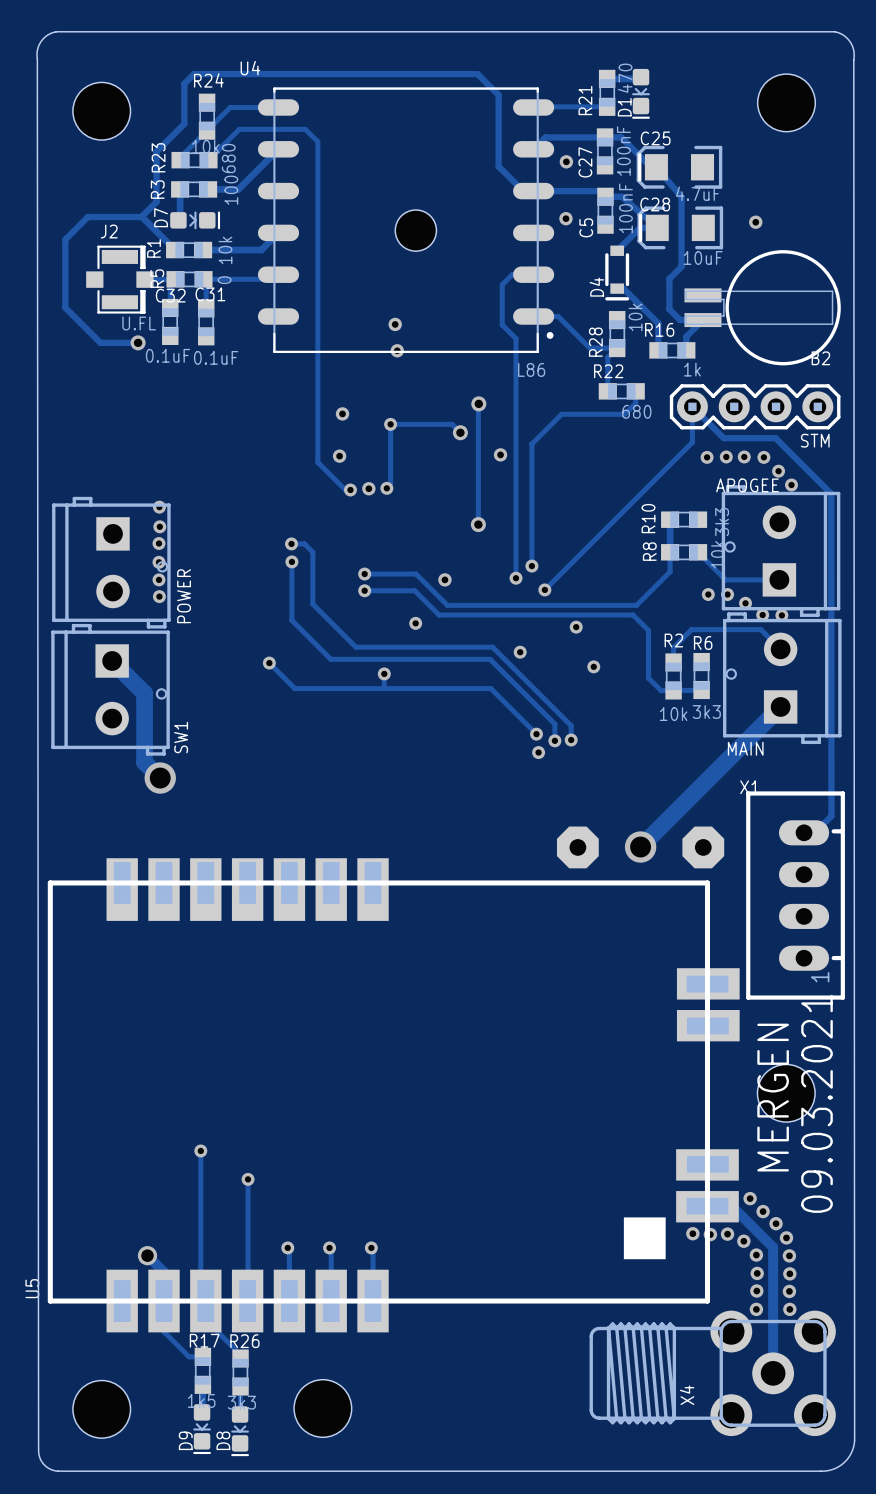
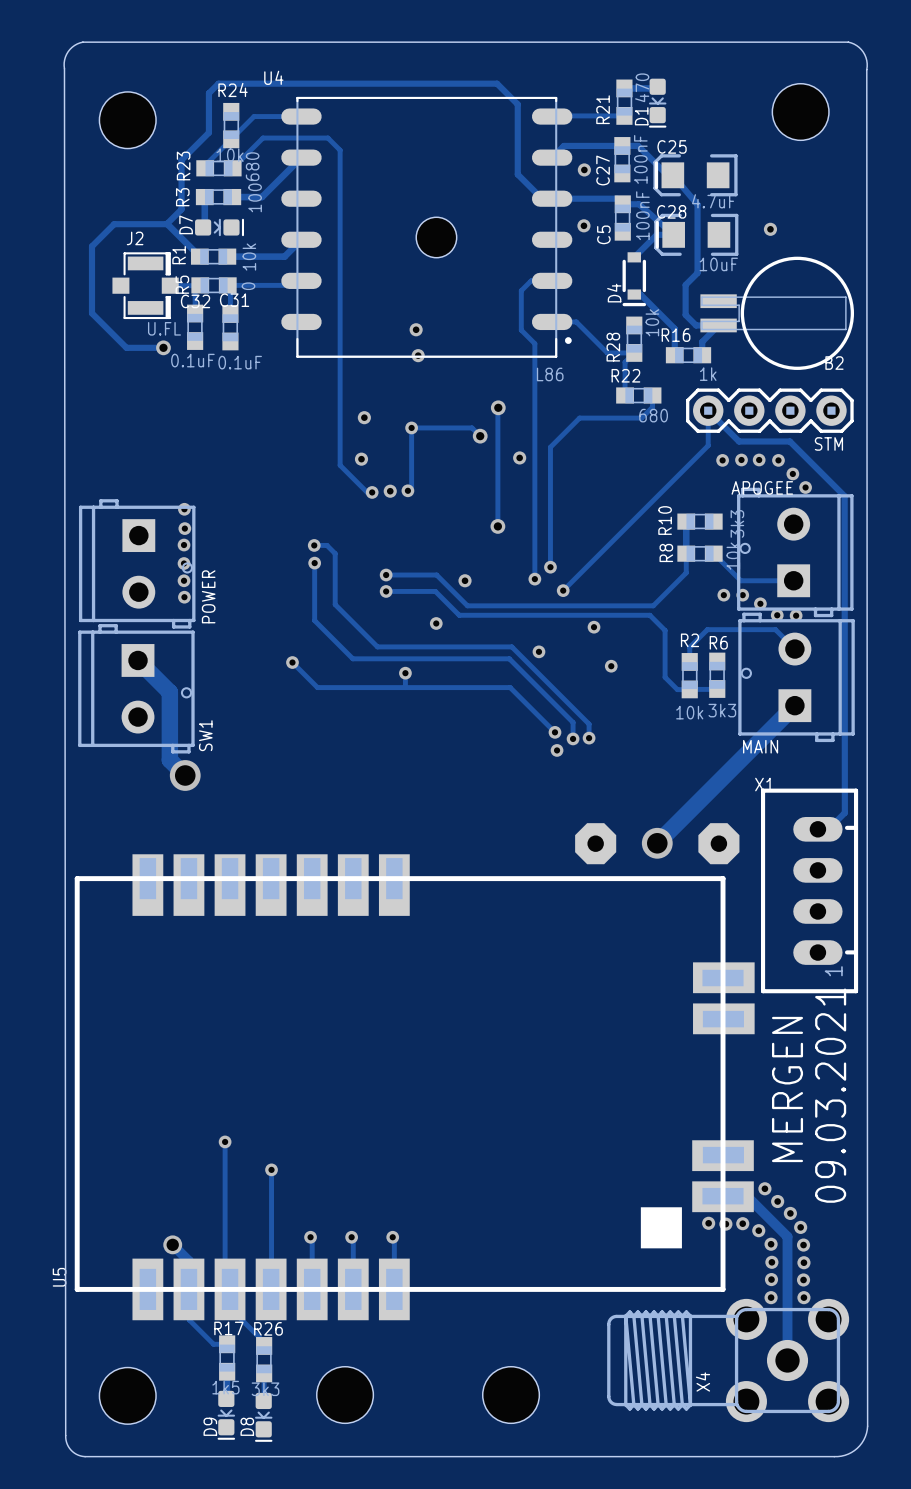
hole: (786, 1093) -> none
hole: none -> (511, 1395)

